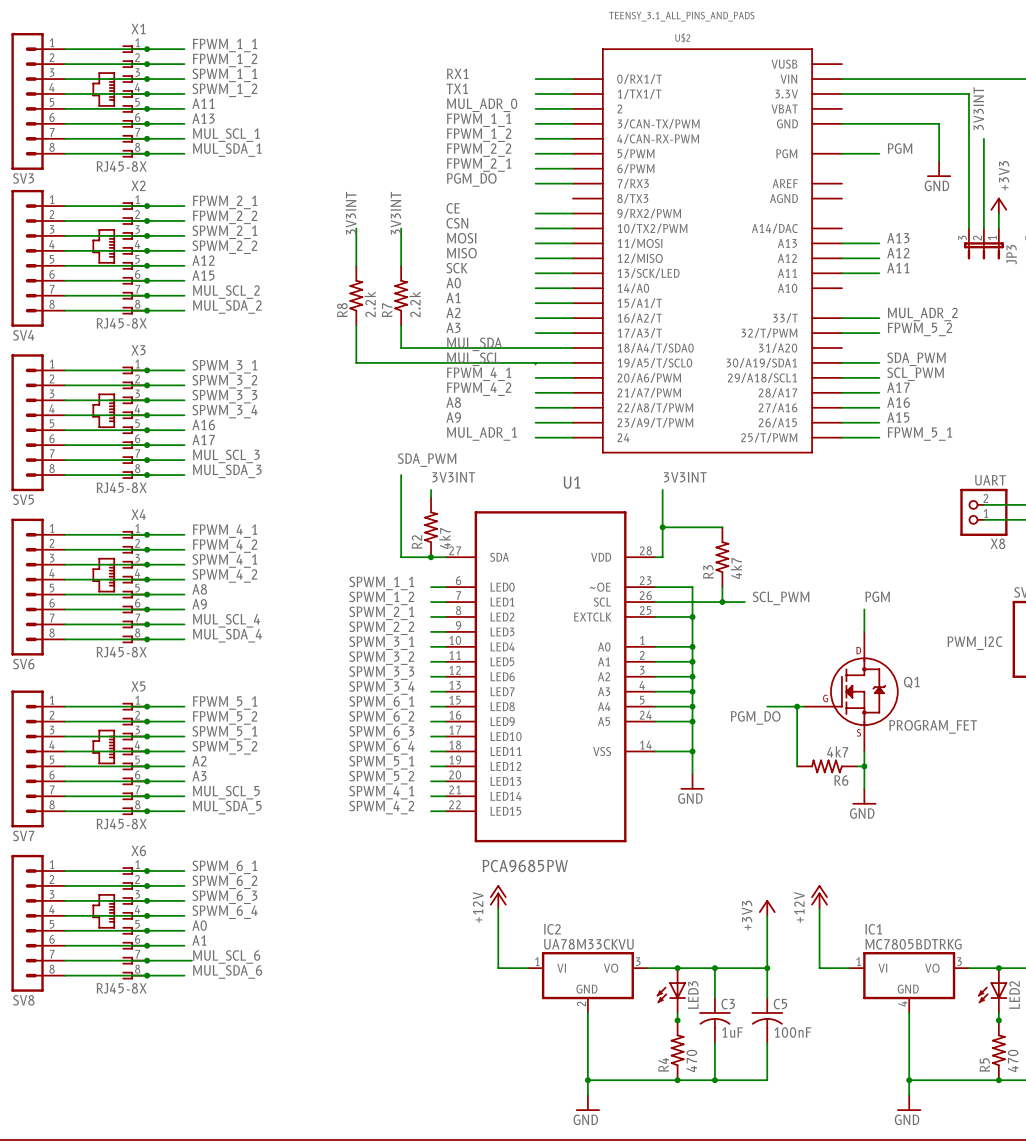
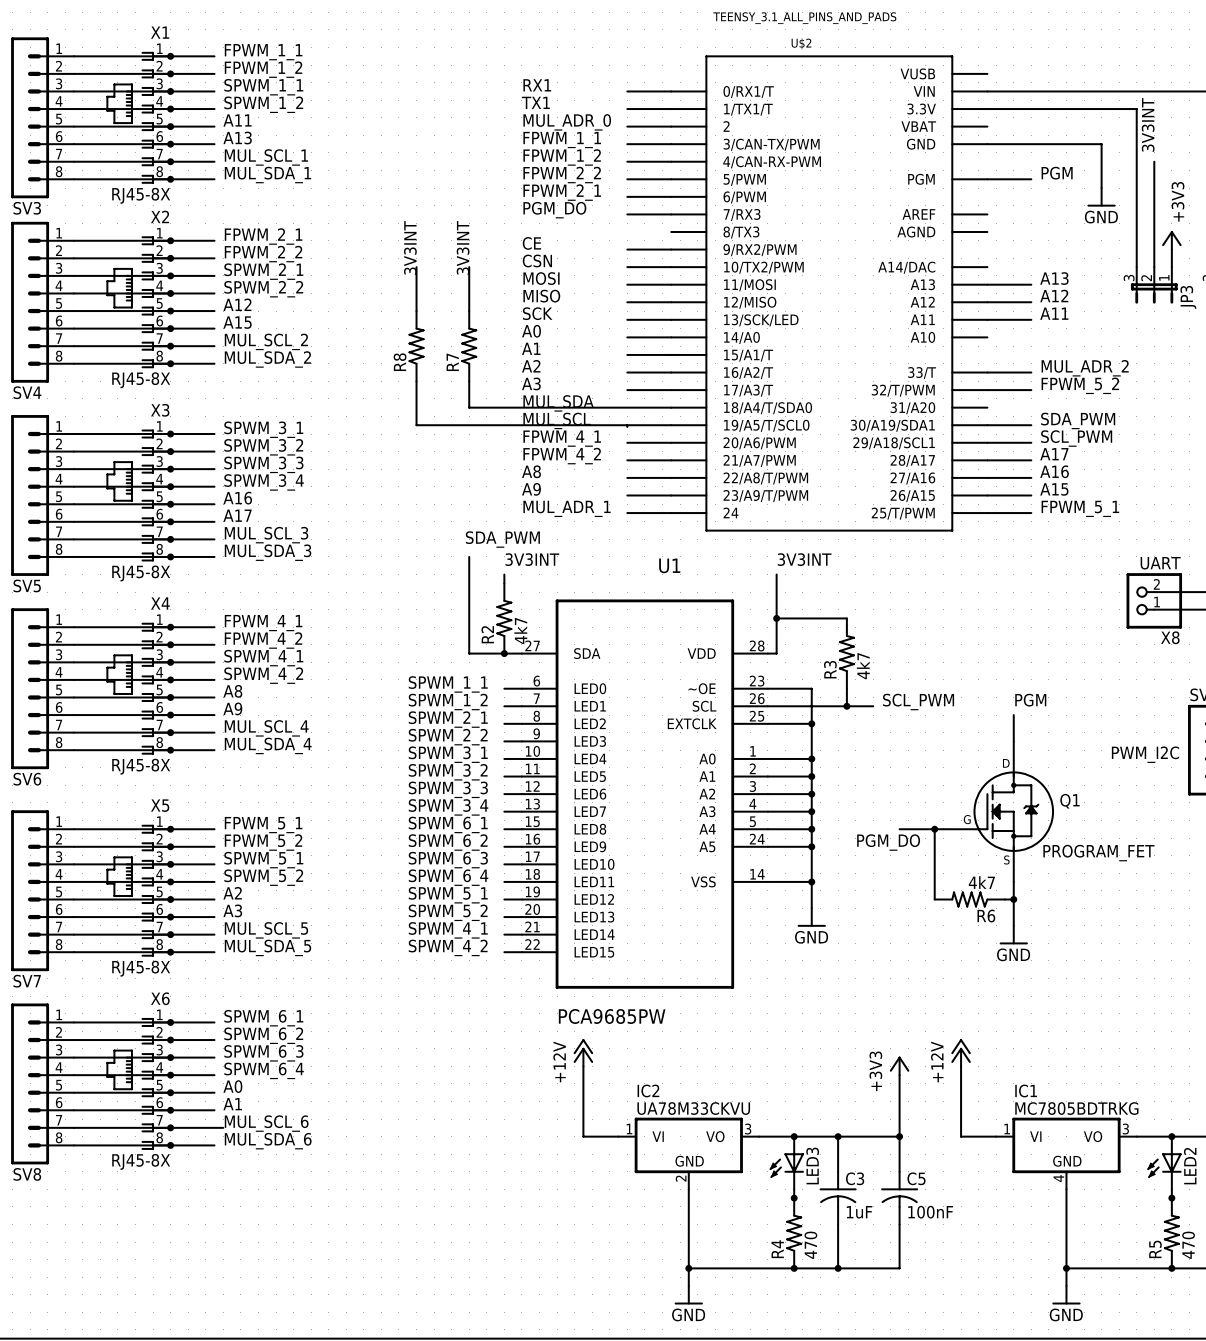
R8 value: 2.2k (370, 304) -> none
R7 value: 2.2k (415, 304) -> none

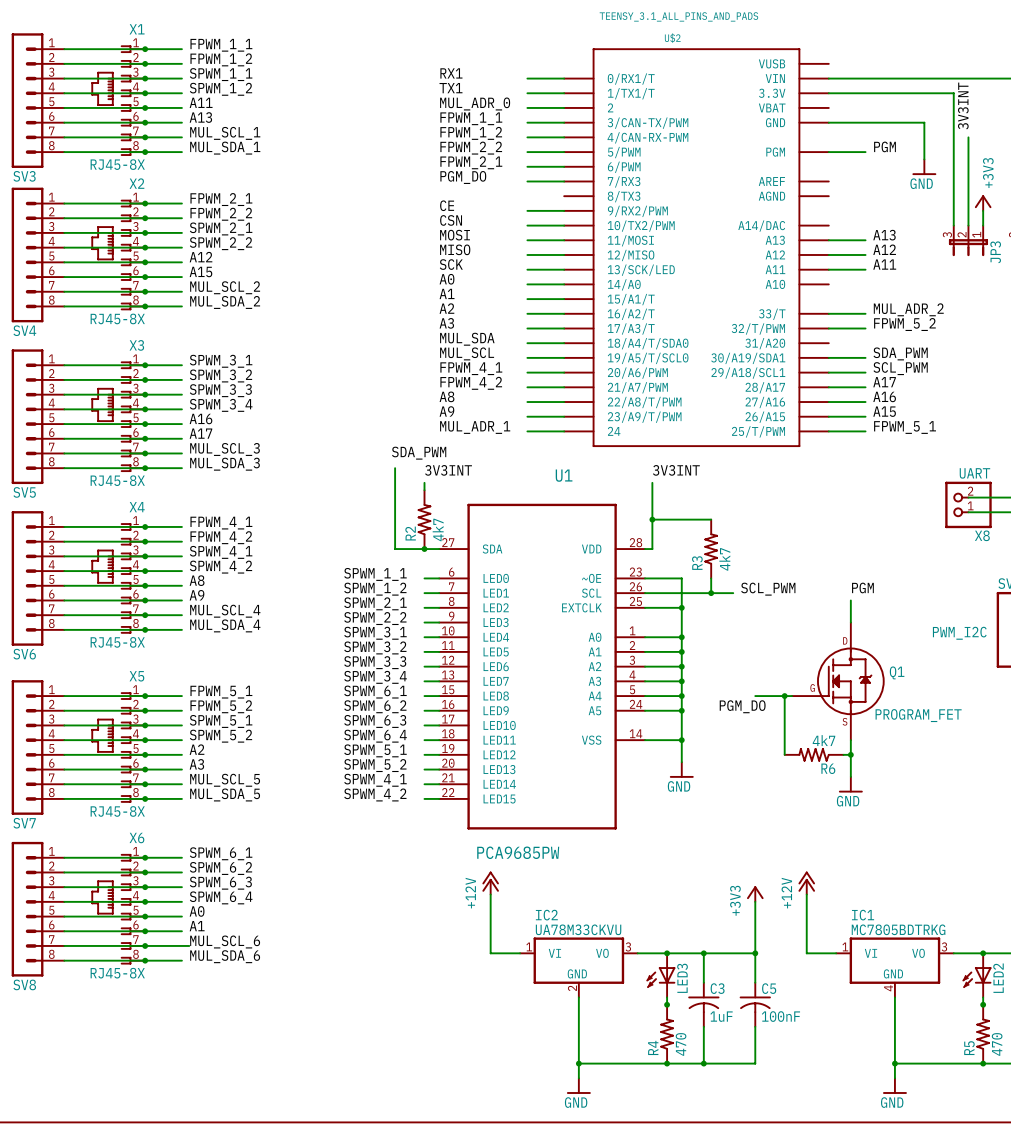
label: 3V3INT (410, 247) -> none
label: 3V3INT (463, 247) -> none
wire: (416, 267) (416, 311) -> none
wire: (469, 267) (469, 311) -> none
R8: (416, 346) -> none
R7: (469, 346) -> none
wire: (416, 381) (416, 425) (627, 425) (627, 426) -> none
wire: (469, 381) (469, 407) (627, 407) -> none

